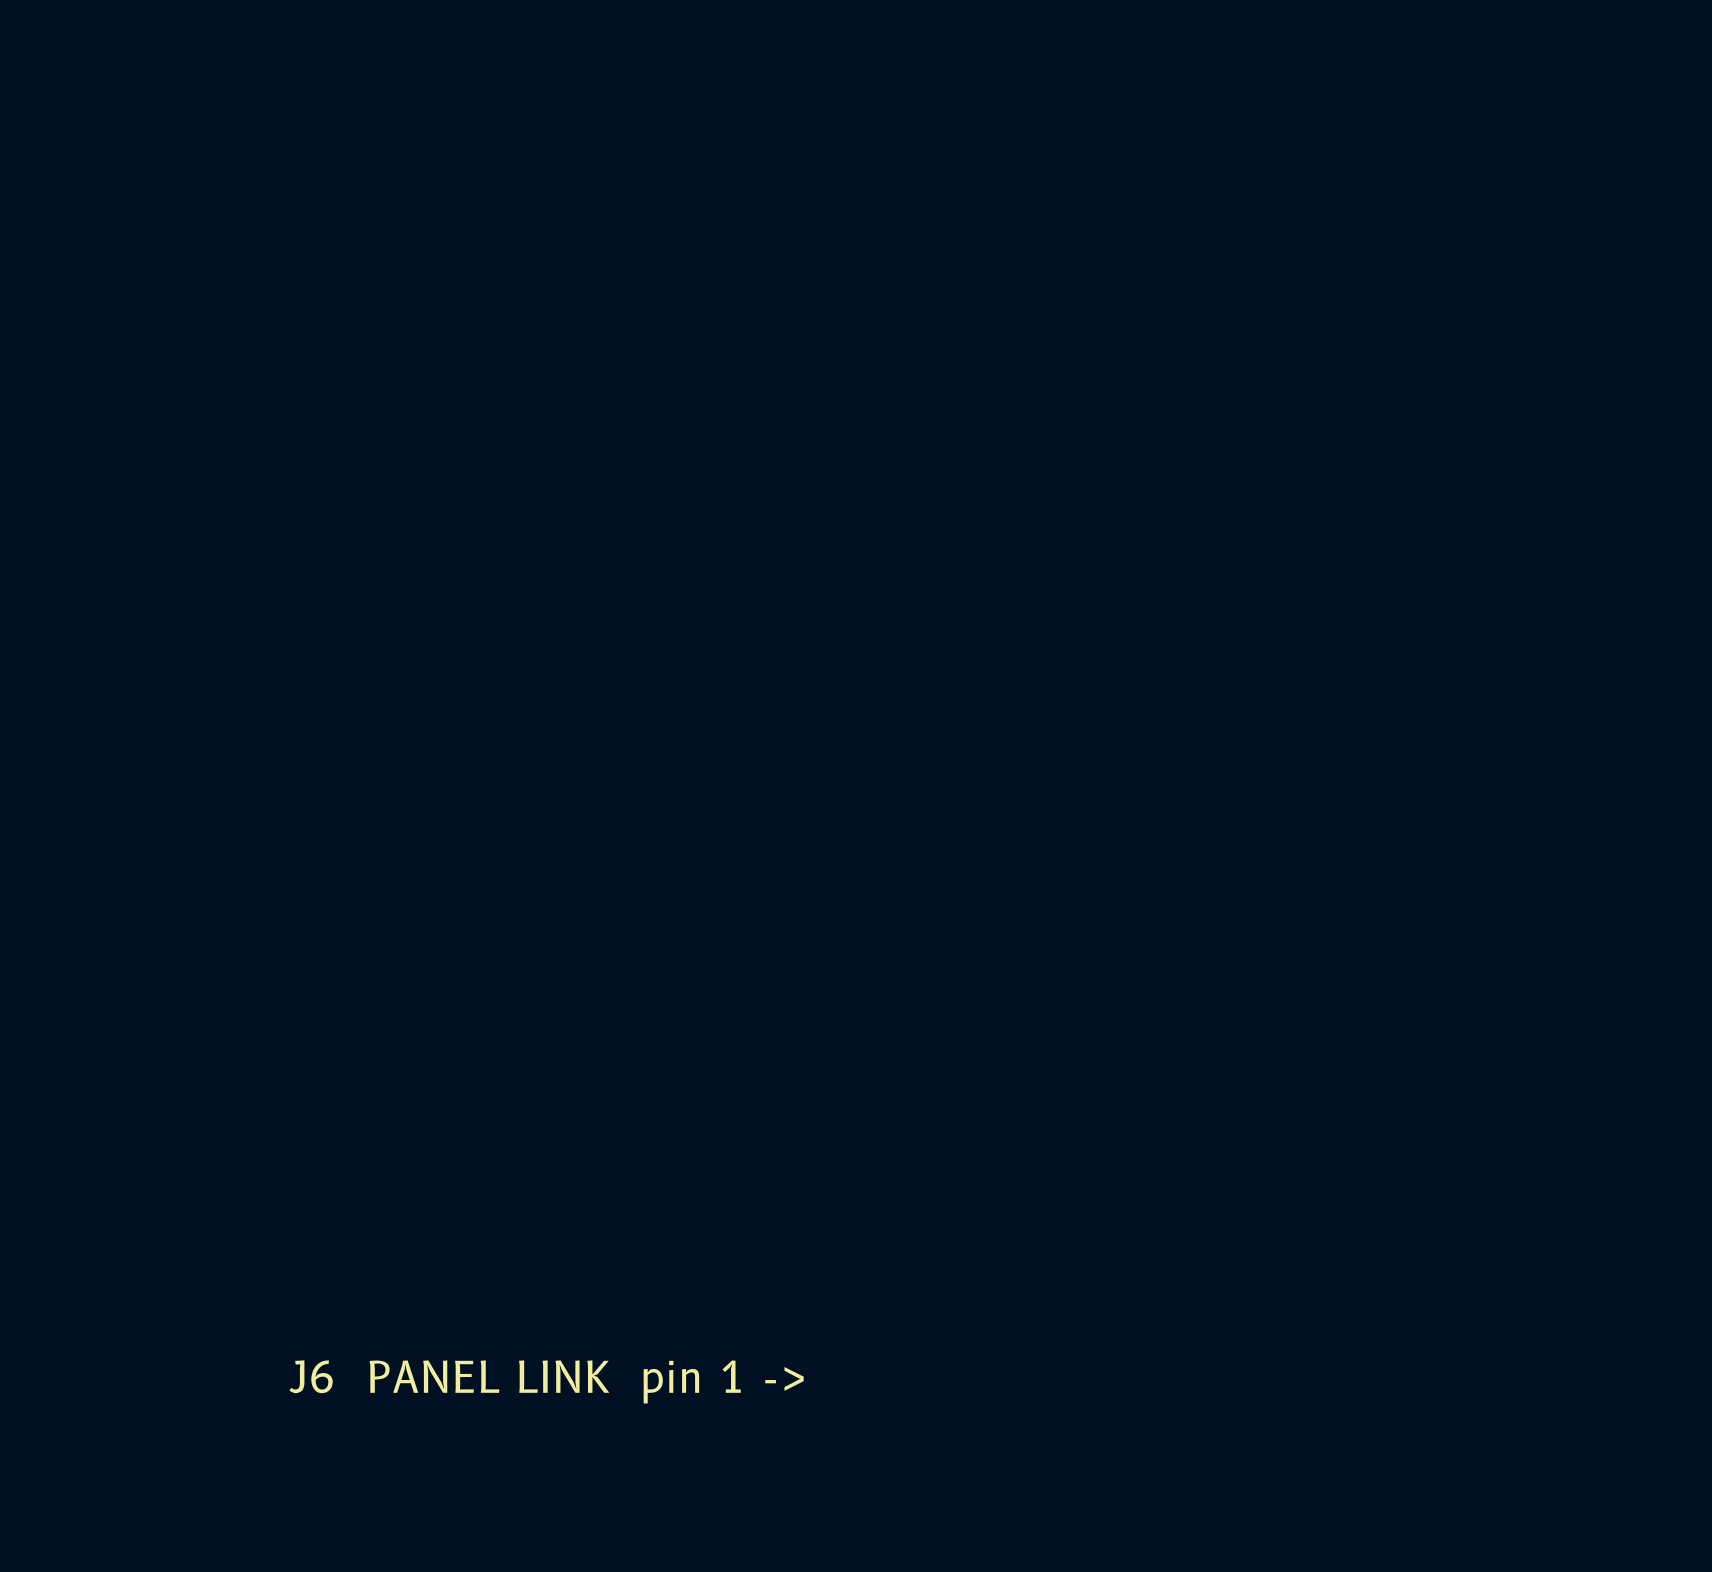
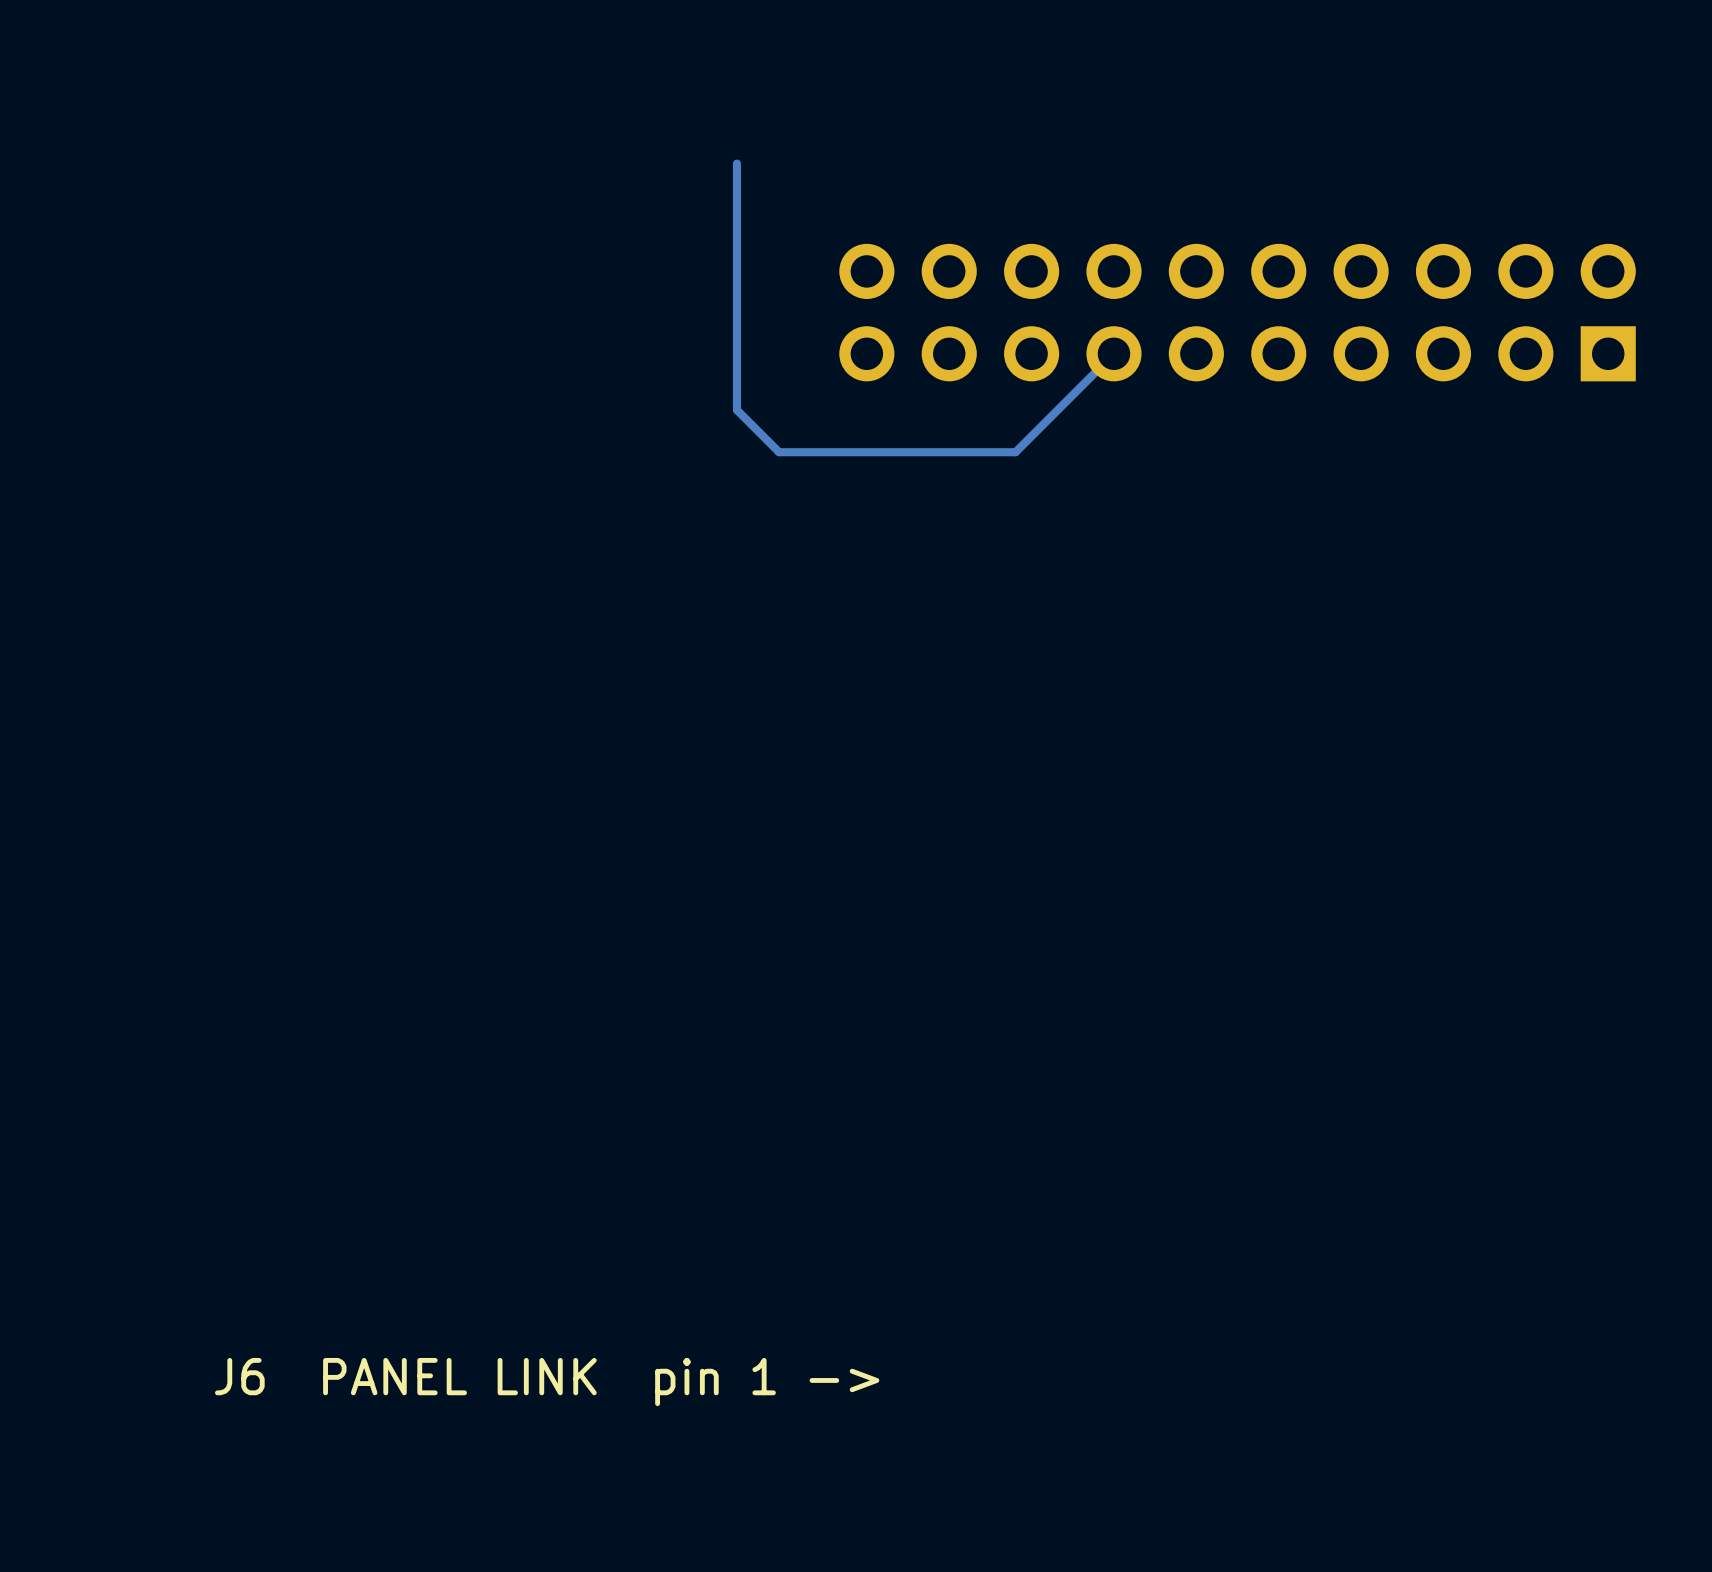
track: none -> (736, 163) (736, 410) (779, 452) (1015, 452) (1113, 353)
part: none -> (1237, 312)

